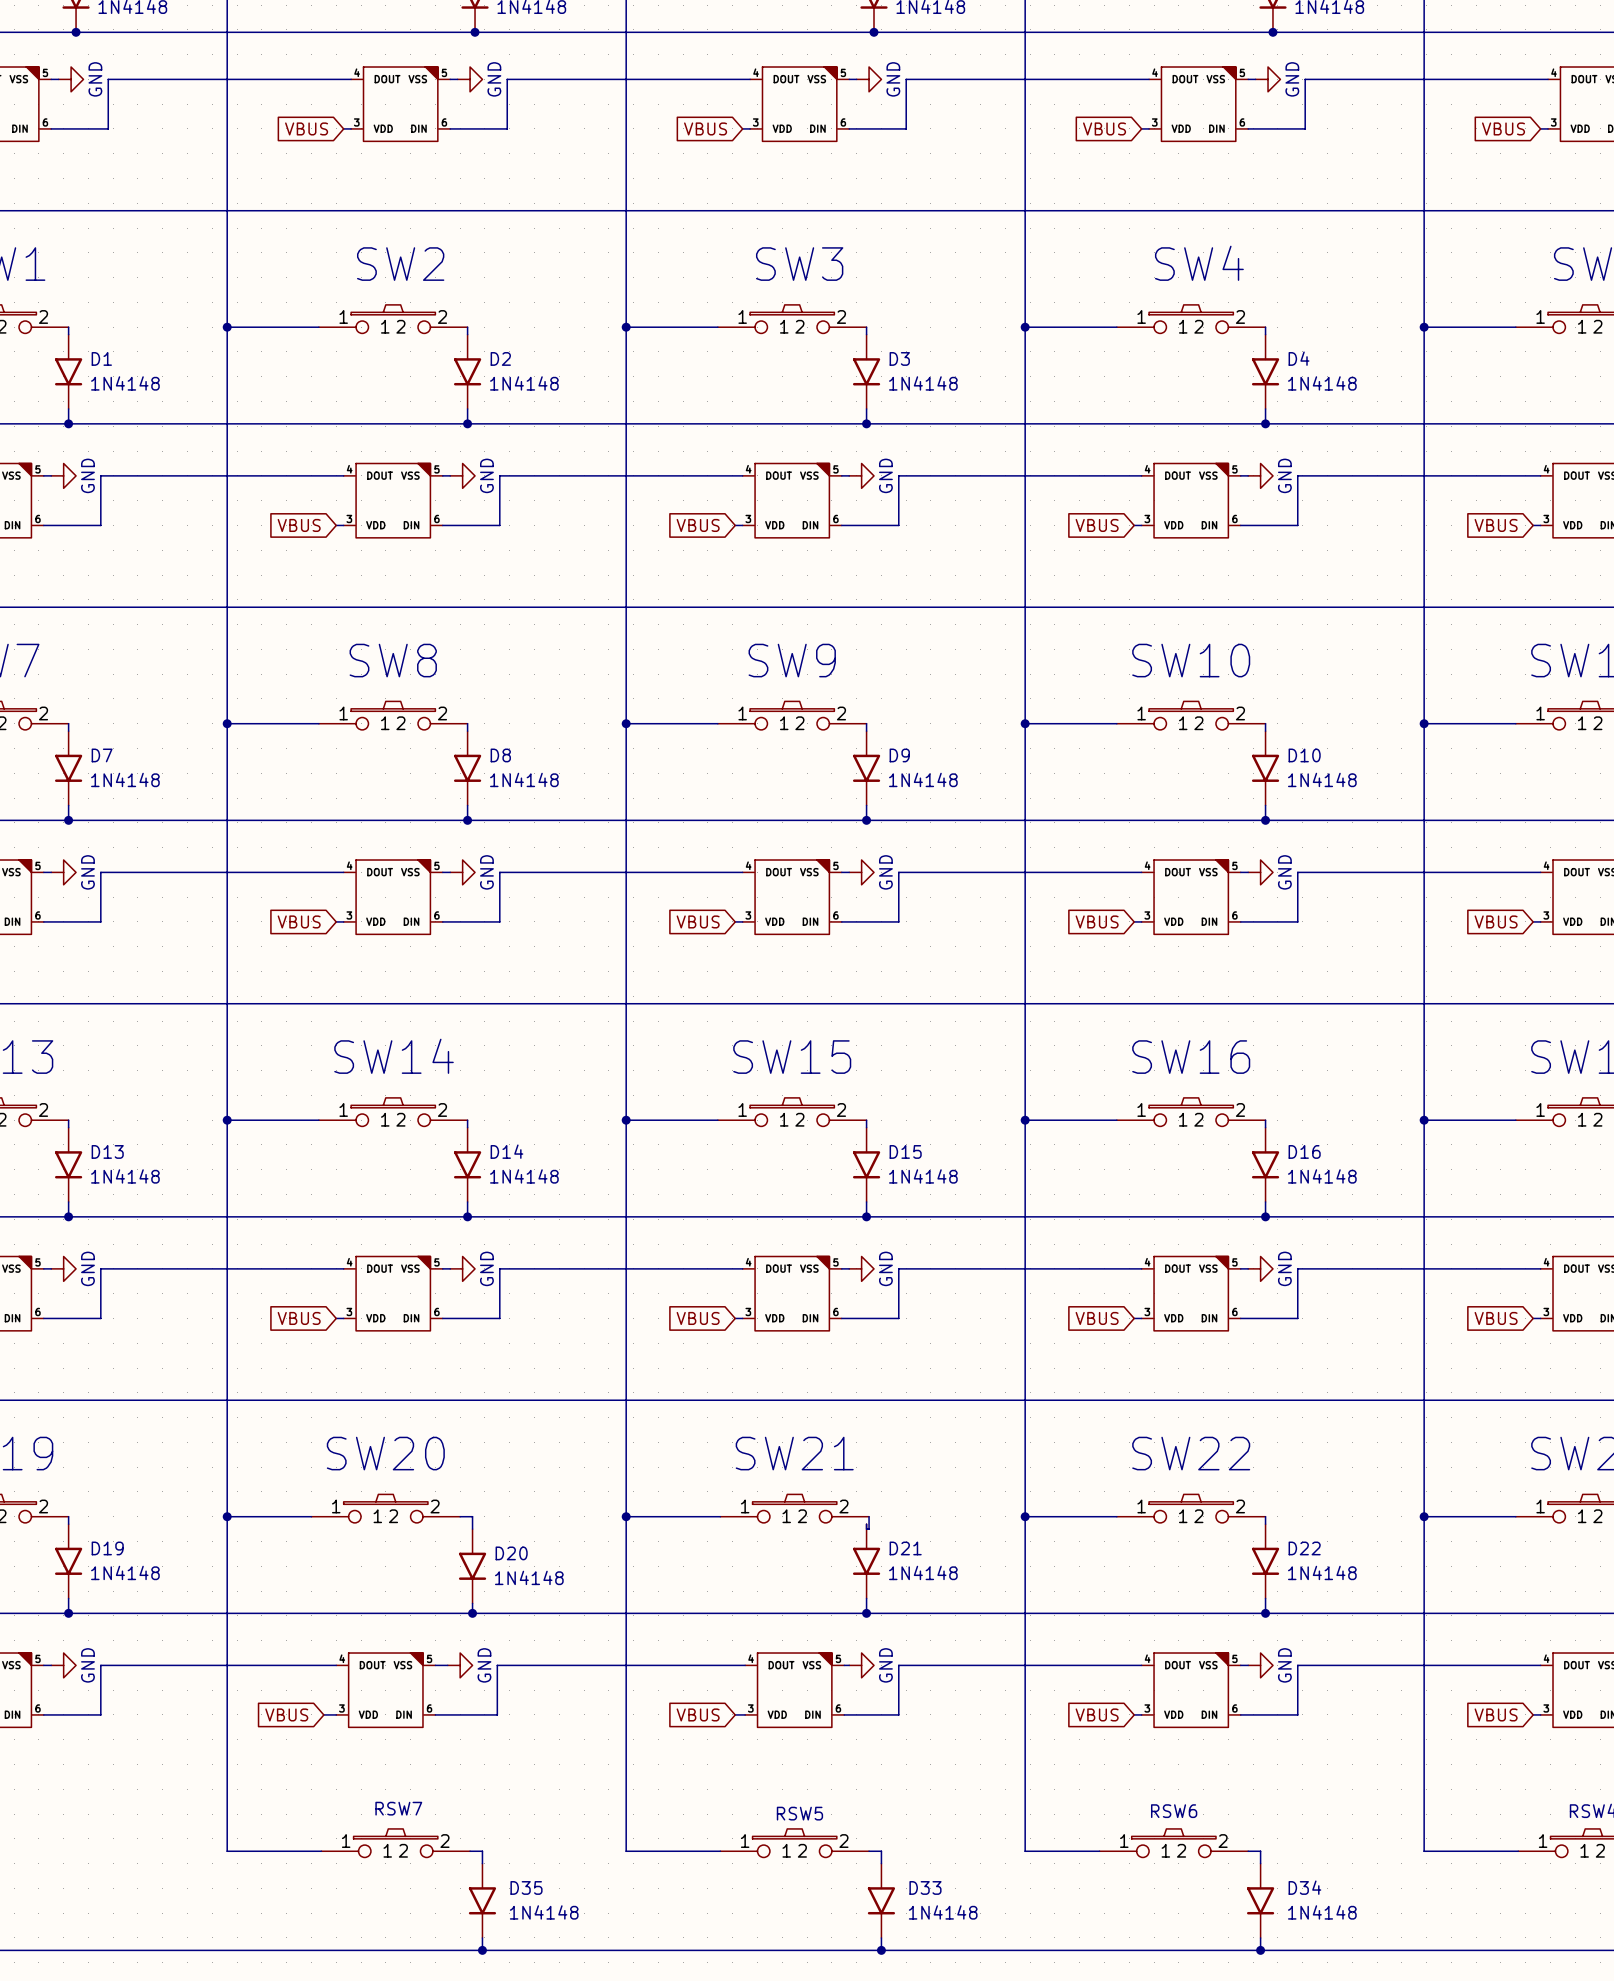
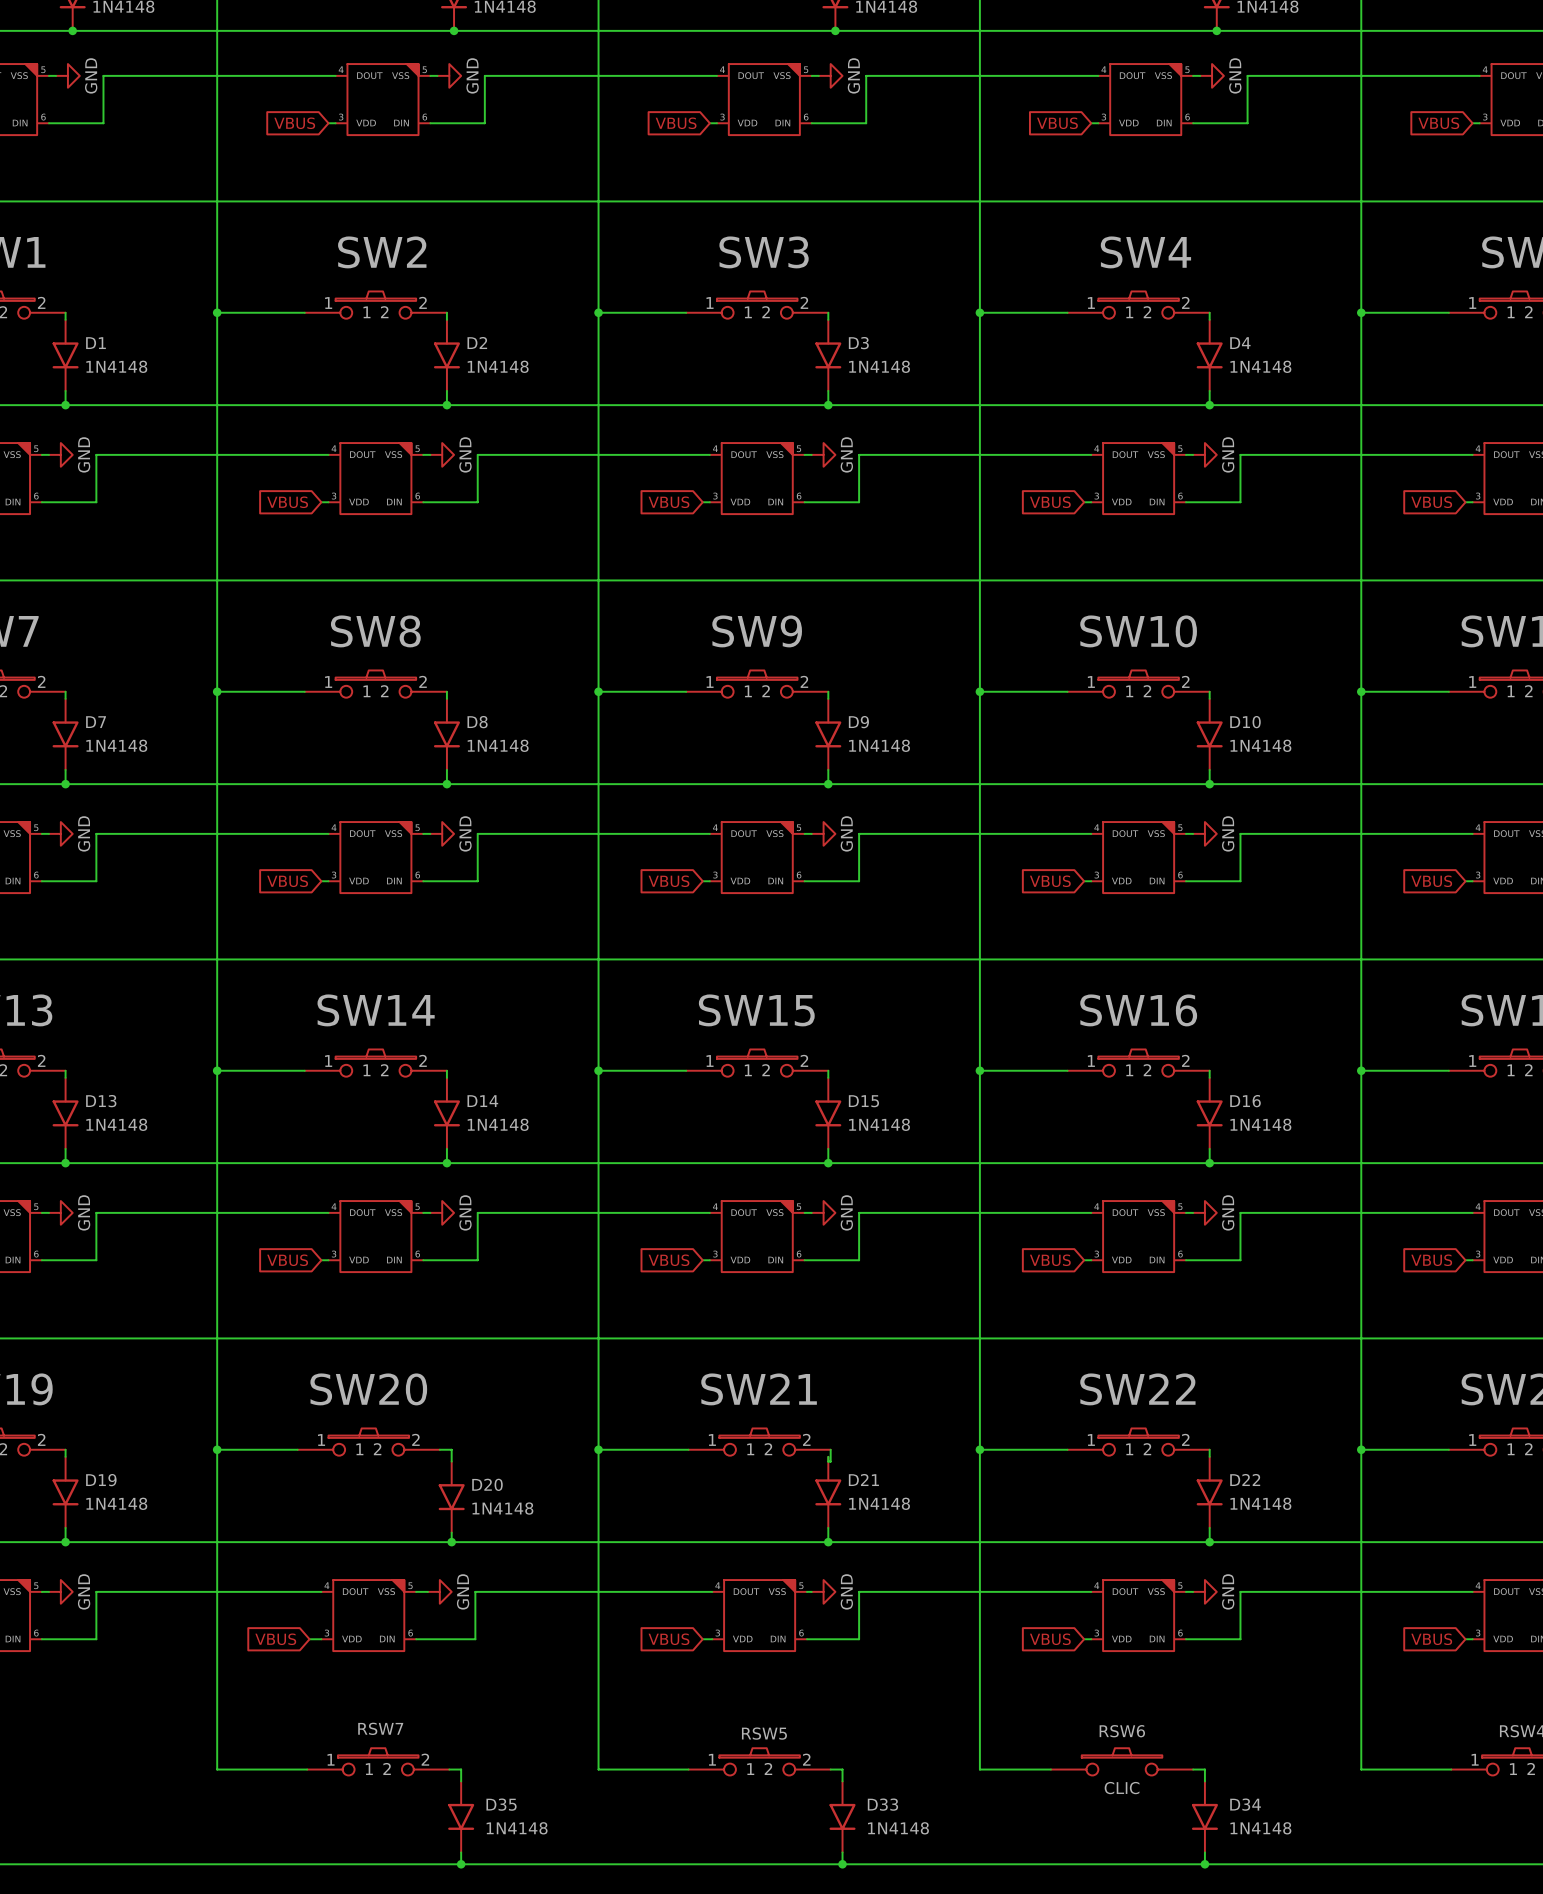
RSW6 pin number: 1 (1124, 1841) -> none
RSW6 pin number: 2 (1223, 1841) -> none
RSW6 pin name: 1 (1165, 1850) -> none
RSW6 pin name: 2 (1181, 1850) -> none
RSW6 value: none -> CLIC (1122, 1788)

